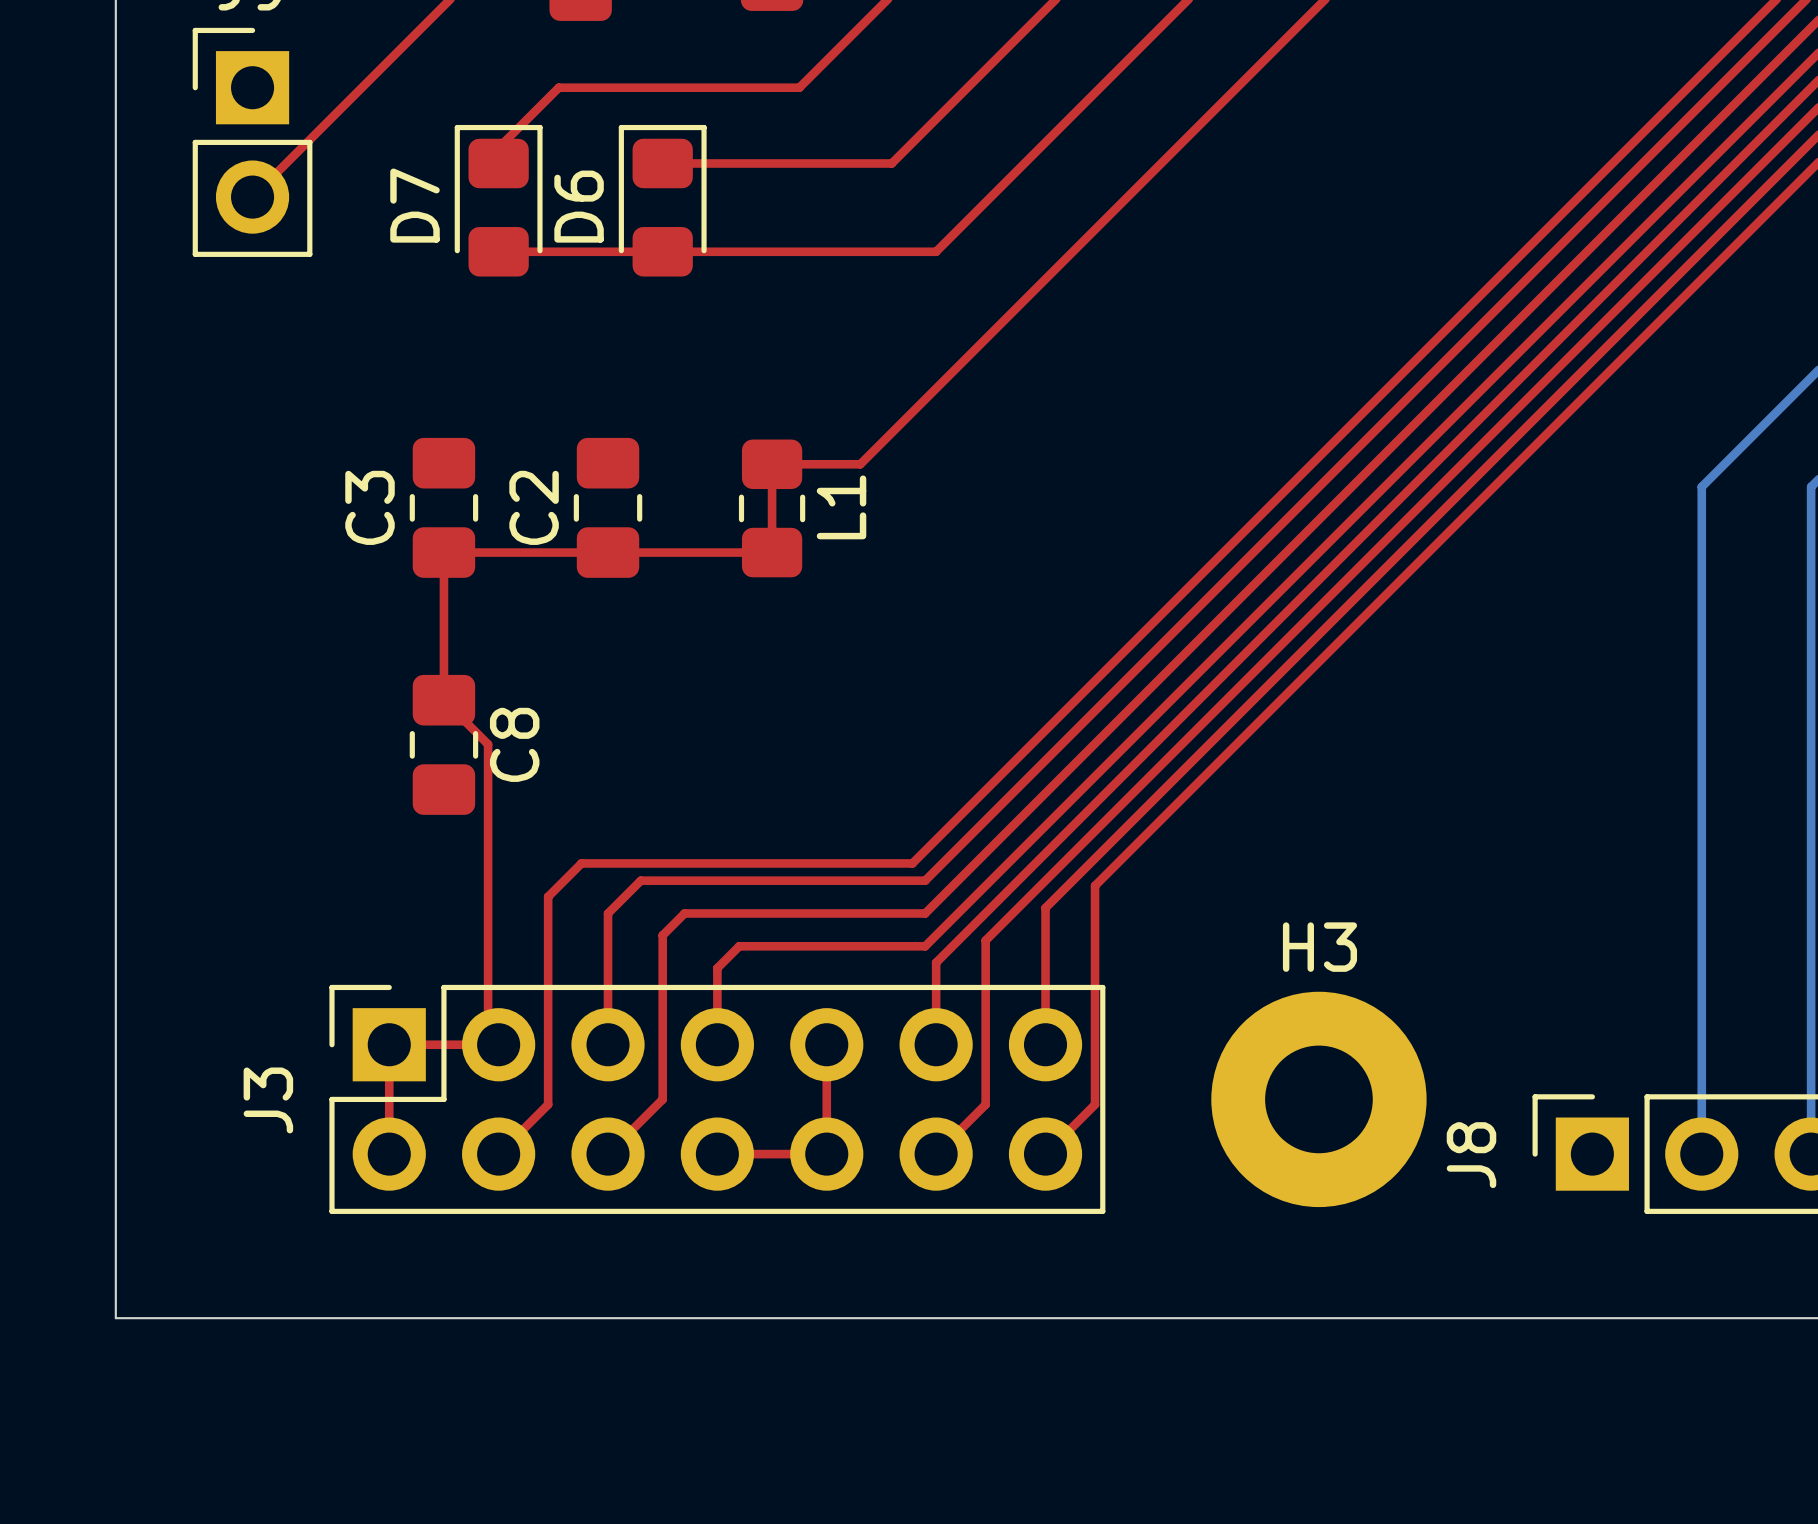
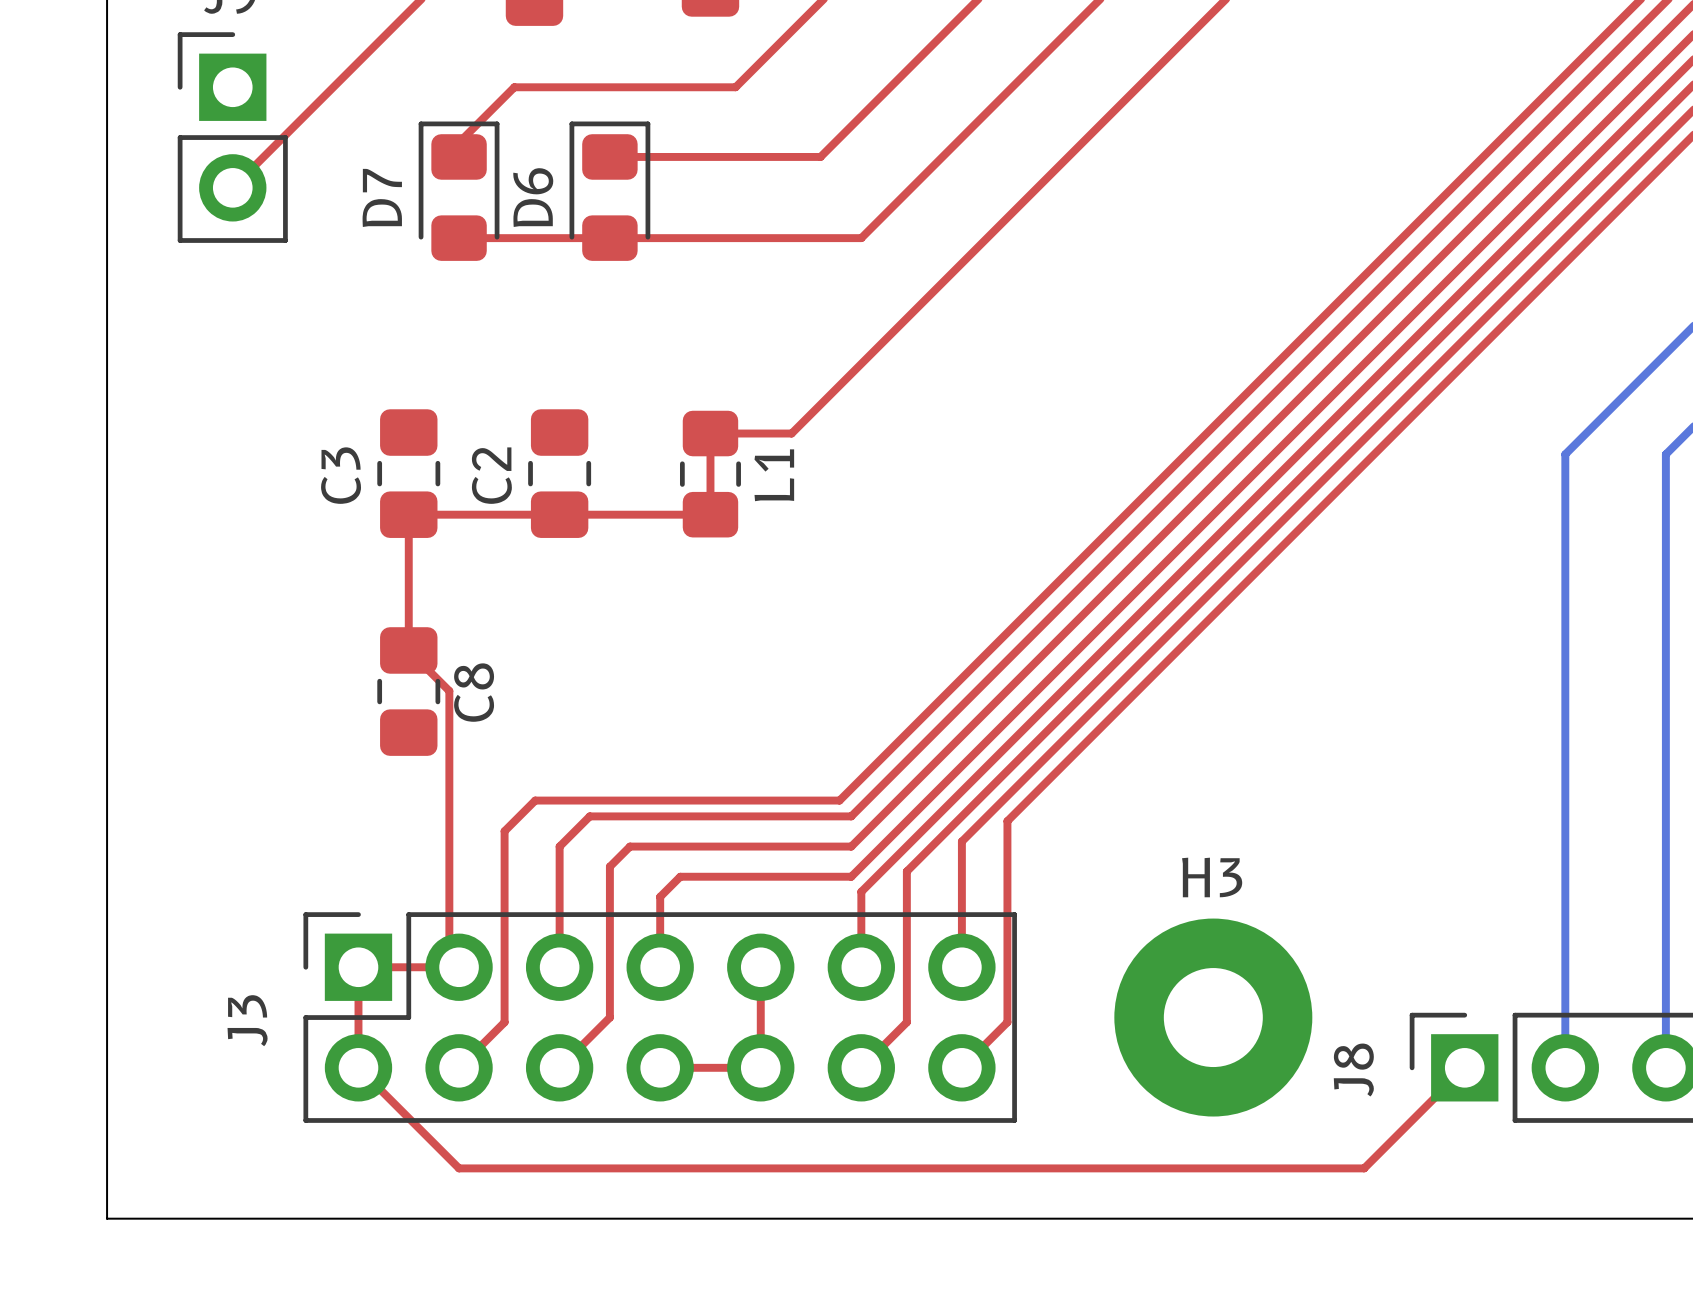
top track: none -> (358, 1067) (459, 1168) (1364, 1168) (1464, 1067)

